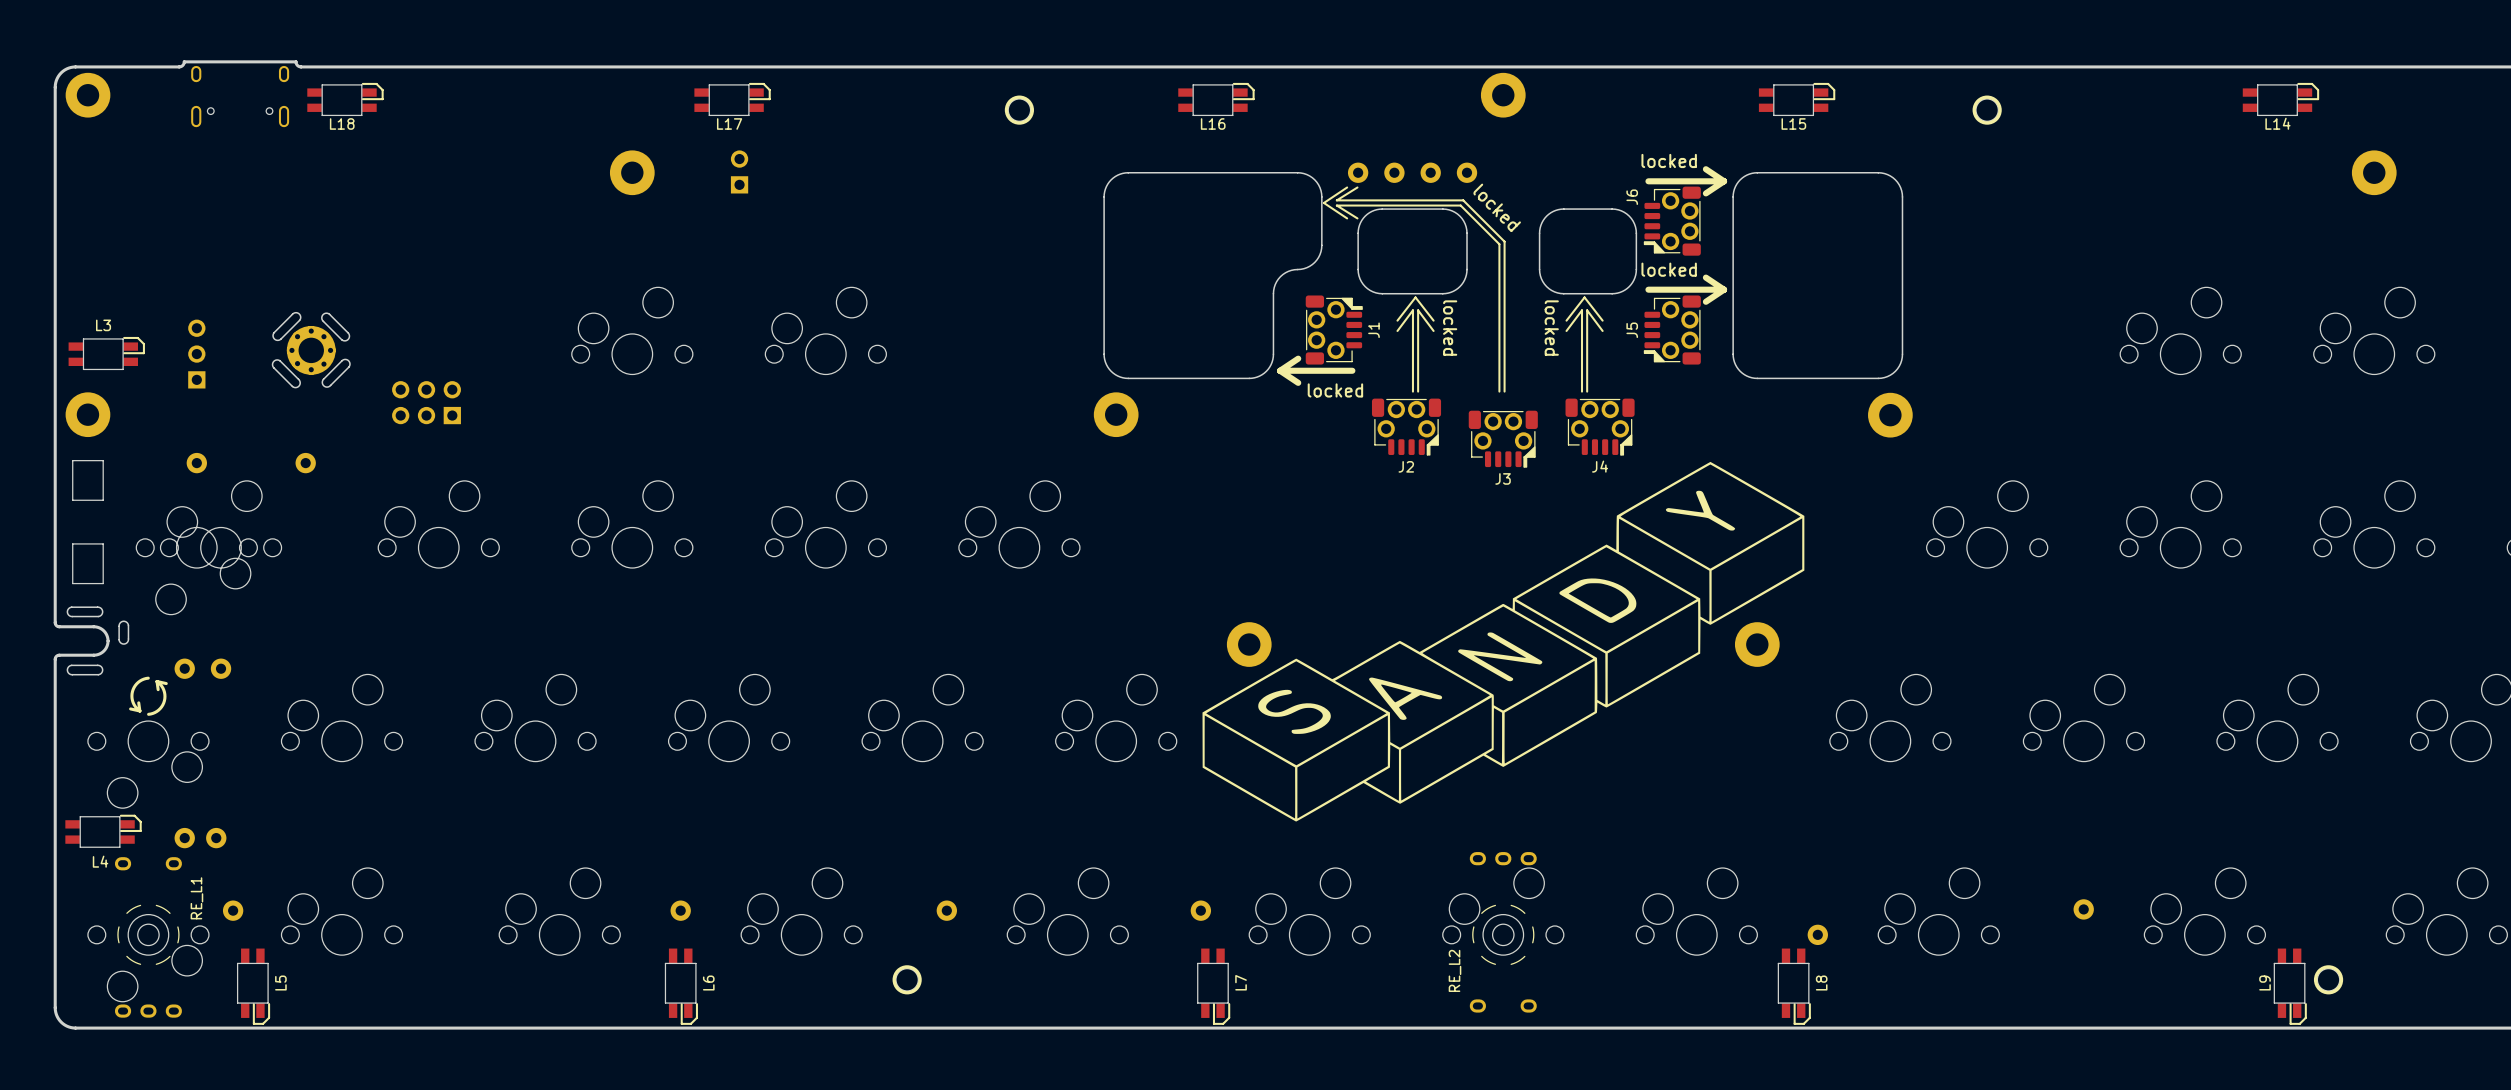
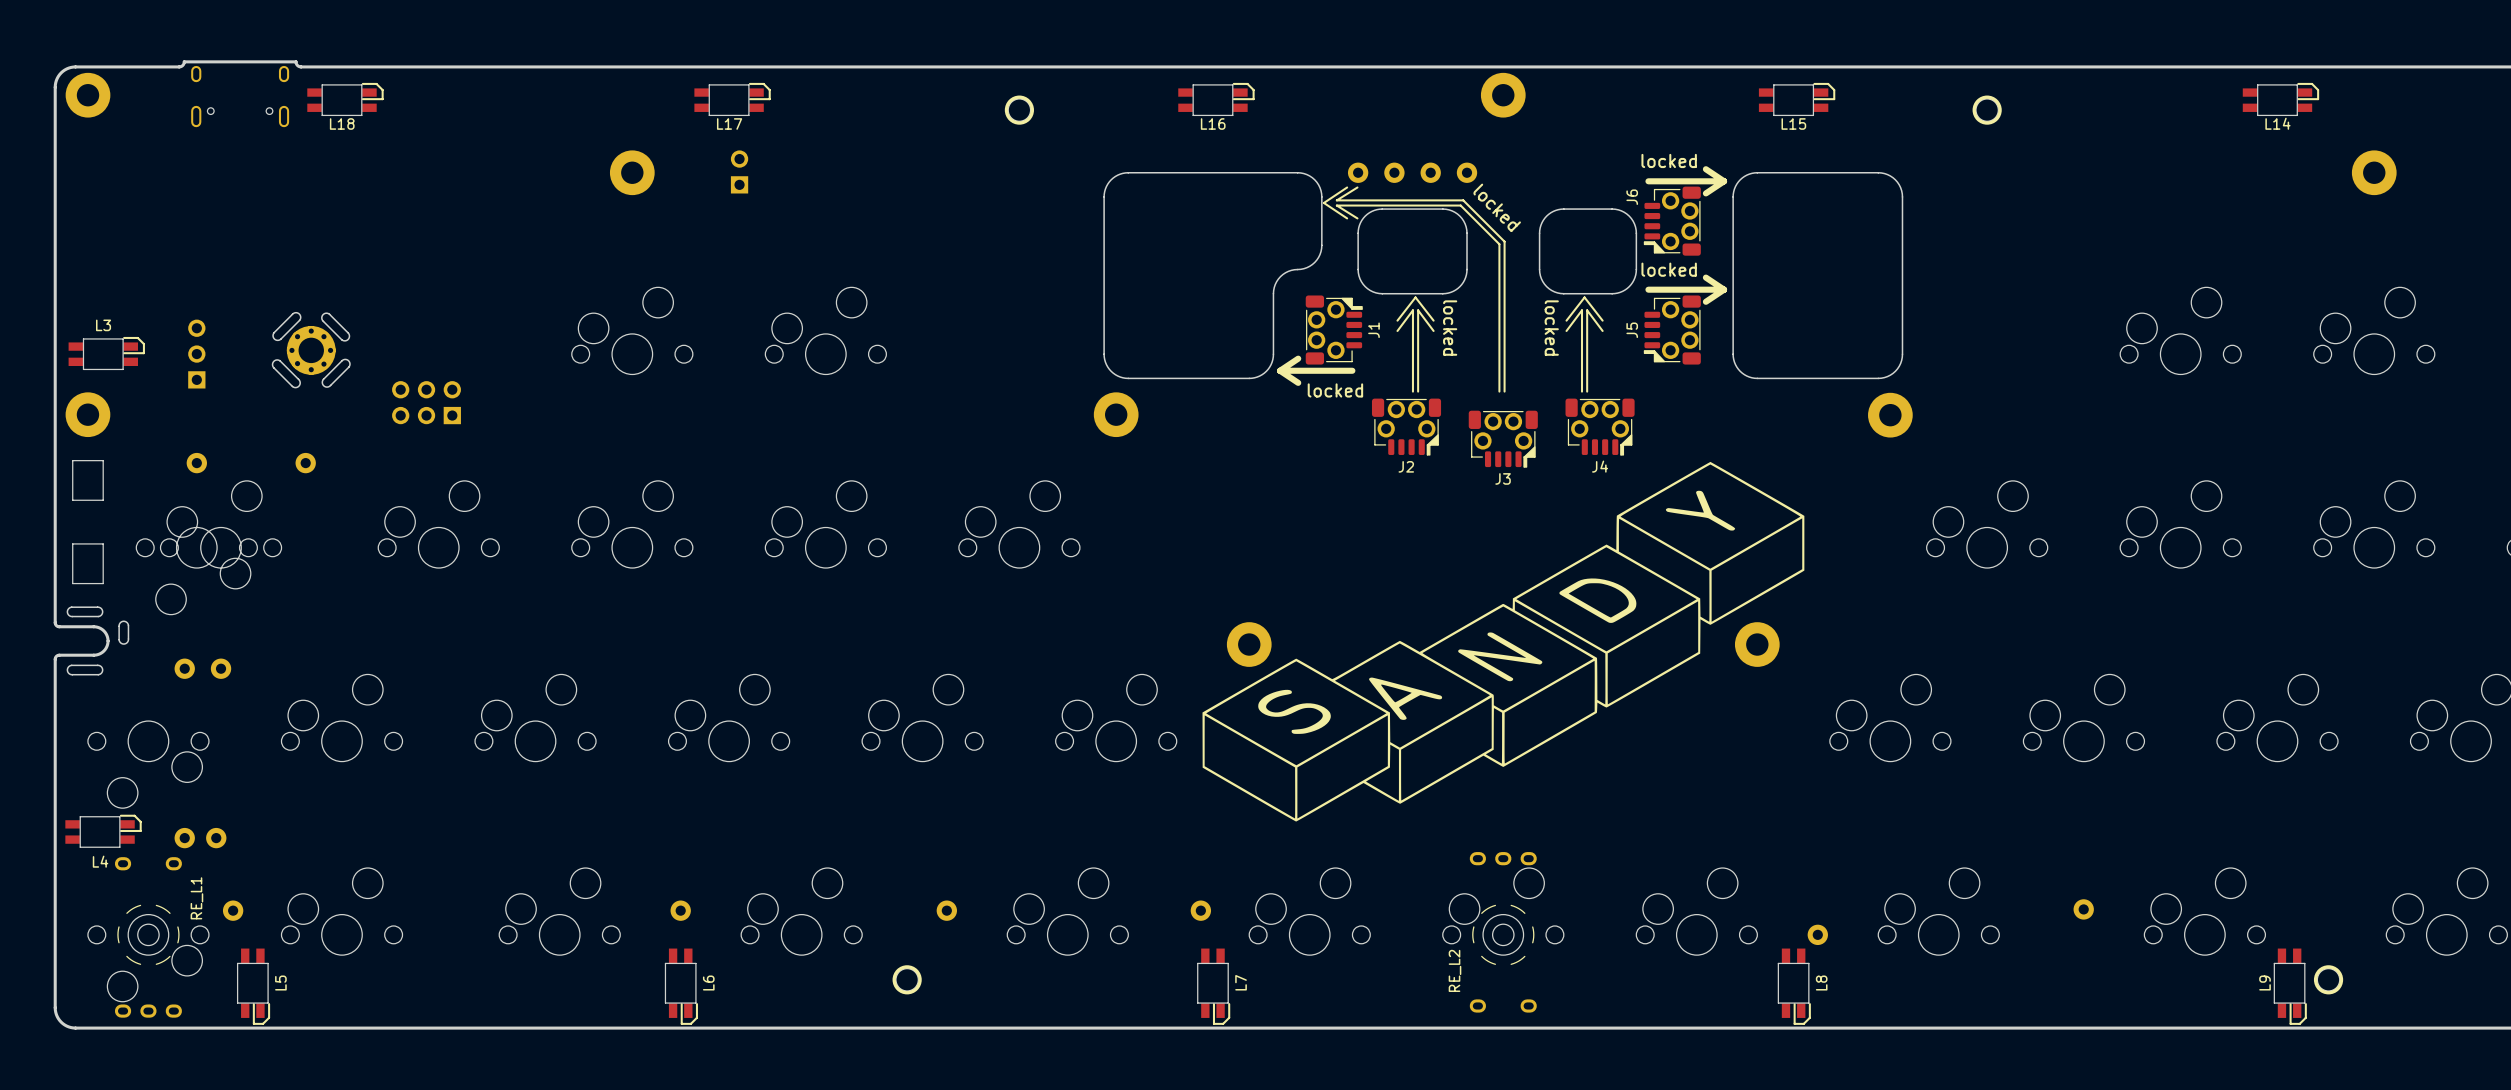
drawing: [129, 676, 168, 716] -> none

